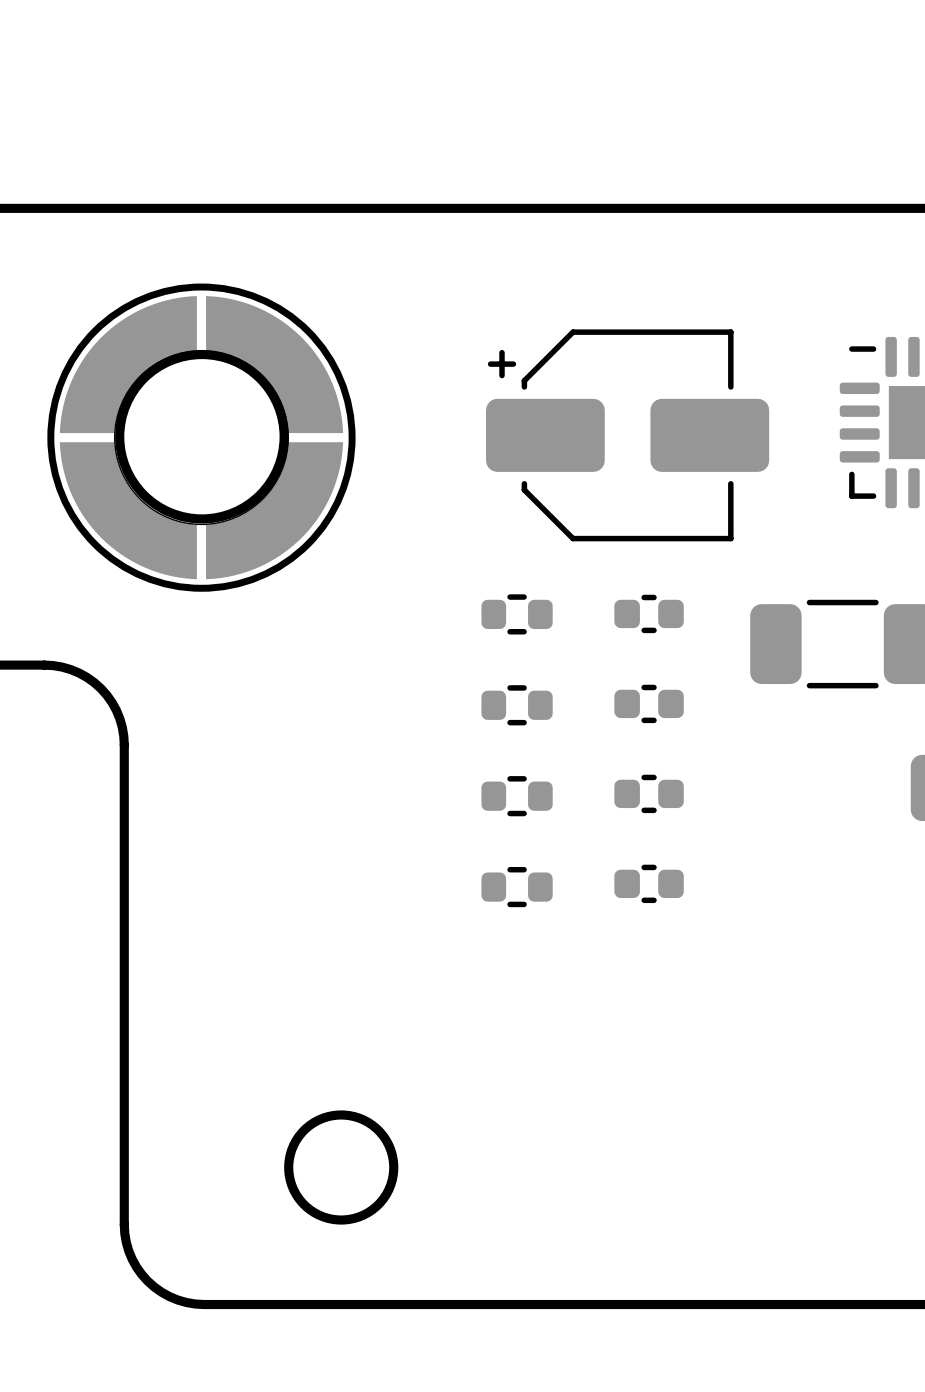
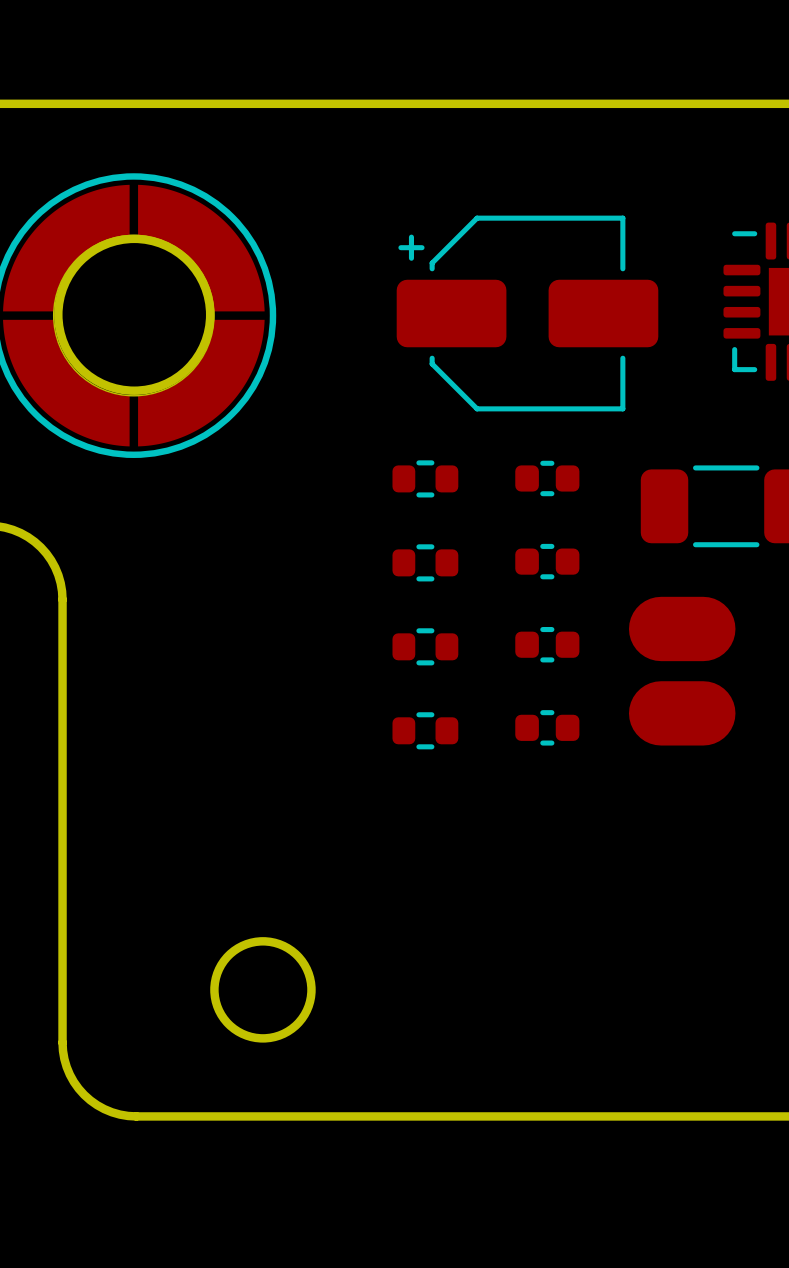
part: none -> (682, 671)

